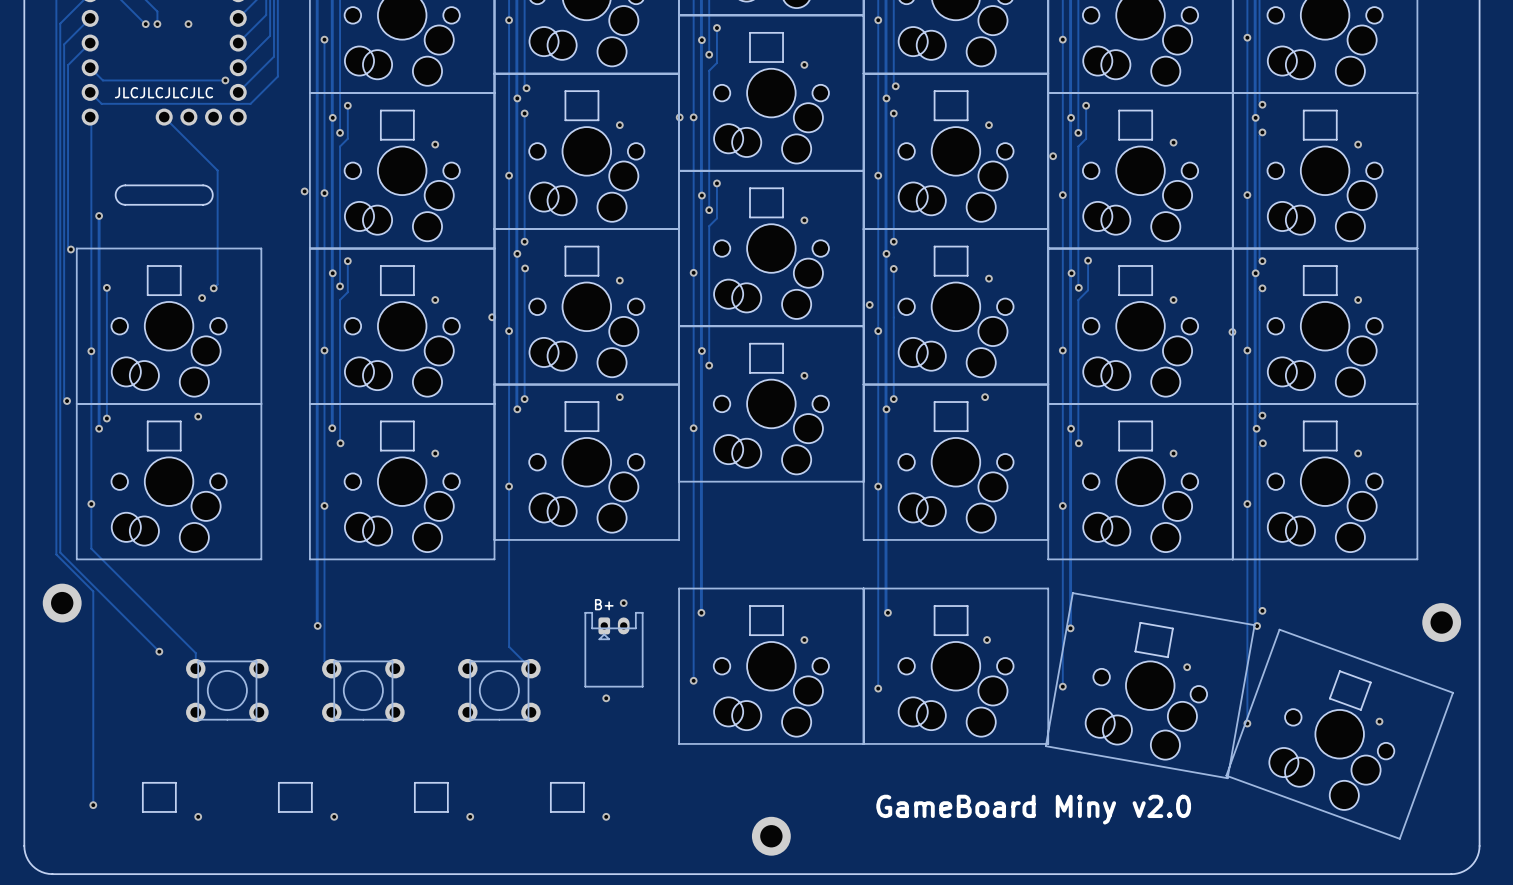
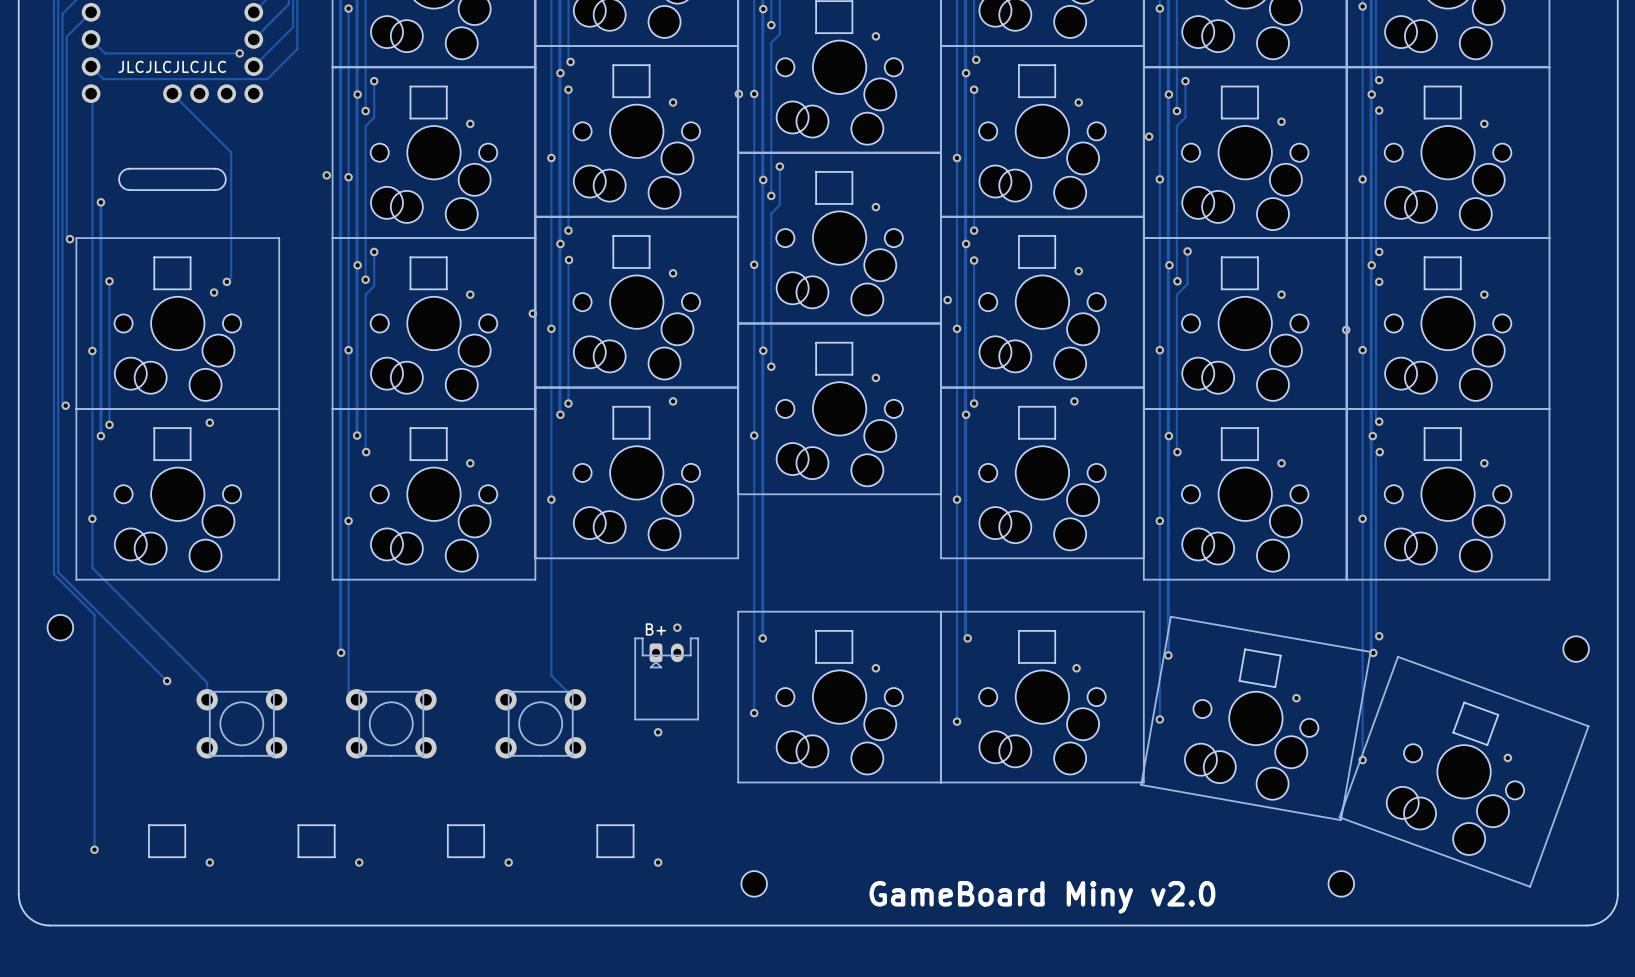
part footprint: [42, 583, 82, 623] -> [47, 614, 74, 641]
part footprint: [1422, 603, 1462, 642] -> [1563, 636, 1589, 662]
text position: GameBoard Miny v2.0 (1033, 809) -> GameBoard Miny v2.0 (1042, 897)
part: none -> (754, 883)
part: (771, 836) -> none
part: none -> (1341, 883)

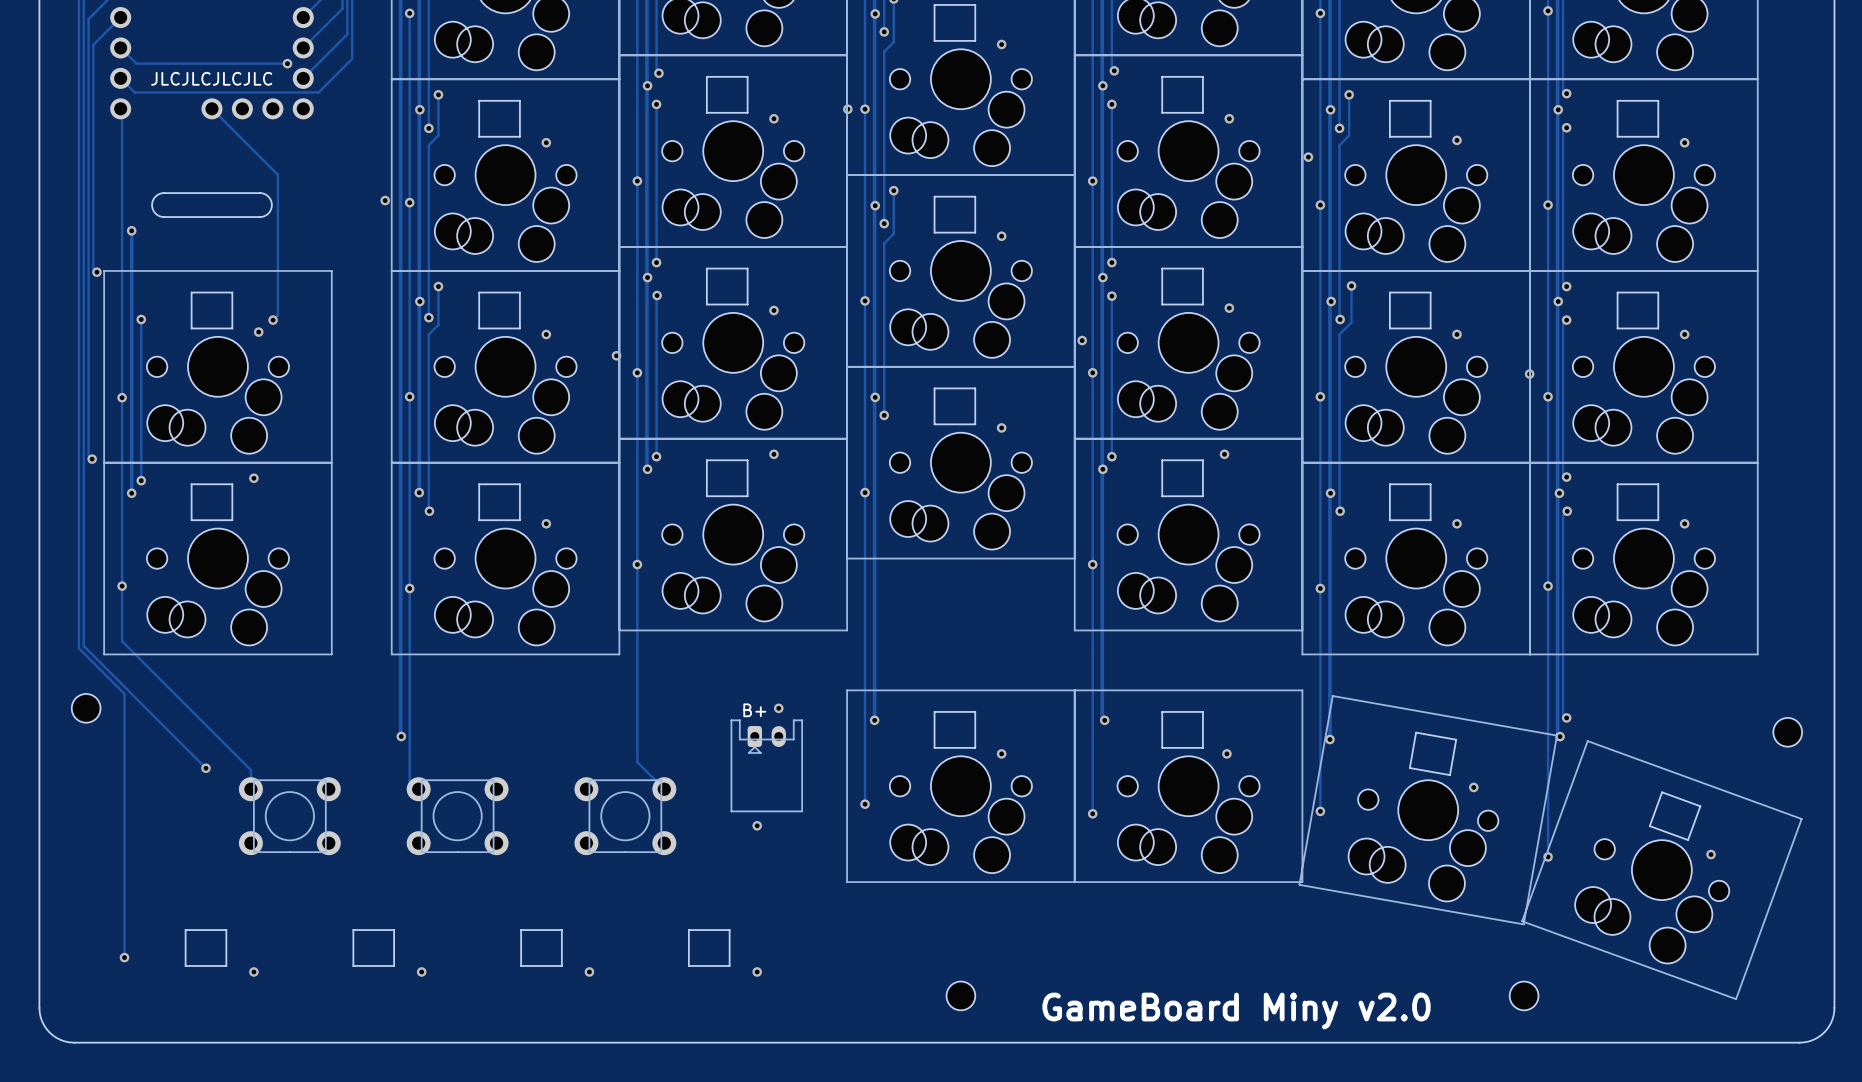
part position: (754, 883) -> (960, 995)
text position: GameBoard Miny v2.0 (1042, 897) -> GameBoard Miny v2.0 (1236, 1011)

